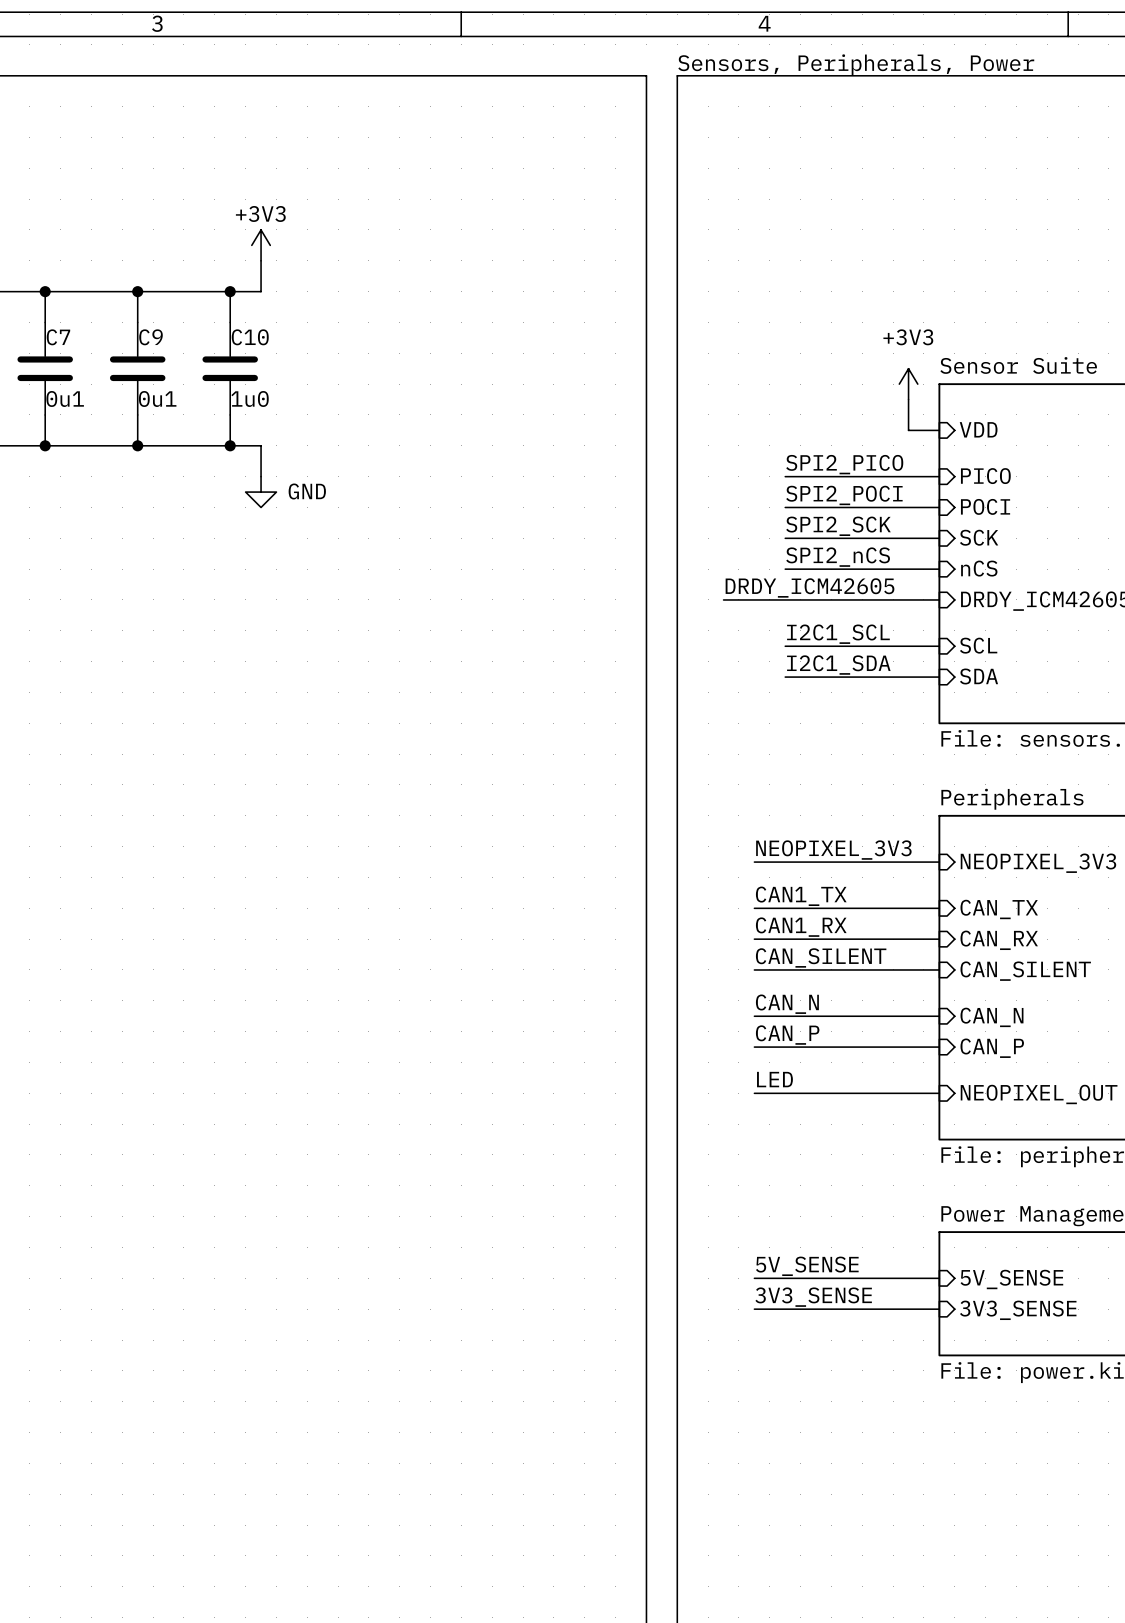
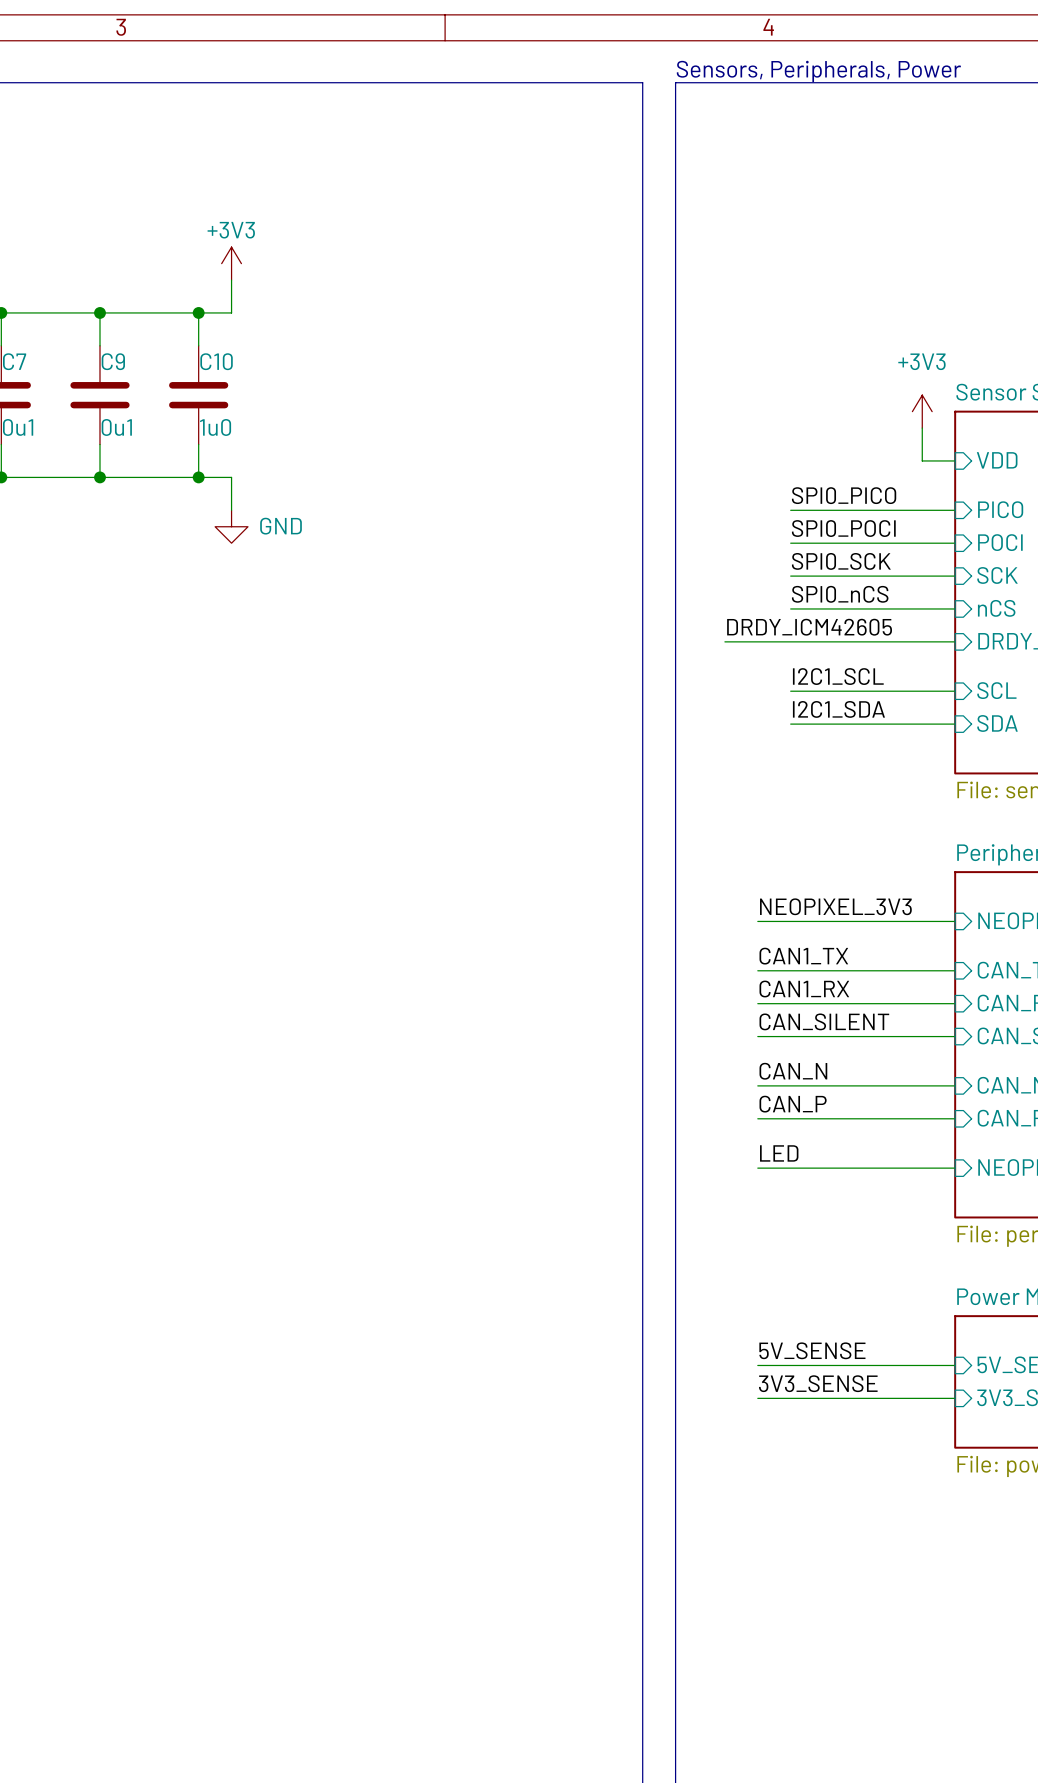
label: SPI2_PICO (844, 464) -> SPI0_PICO (844, 495)
label: SPI2_POCI (844, 495) -> SPI0_POCI (843, 528)
label: SPI2_SCK (838, 526) -> SPI0_SCK (841, 561)
label: SPI2_nCS (838, 557) -> SPI0_nCS (840, 594)

